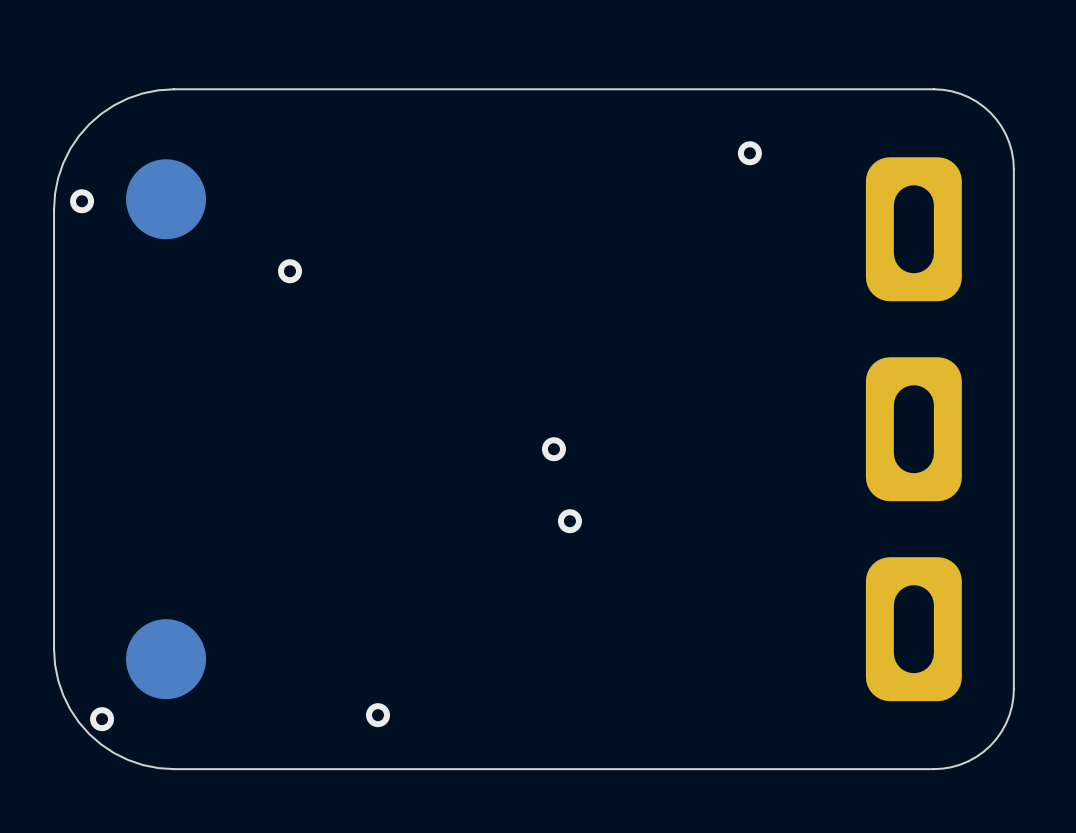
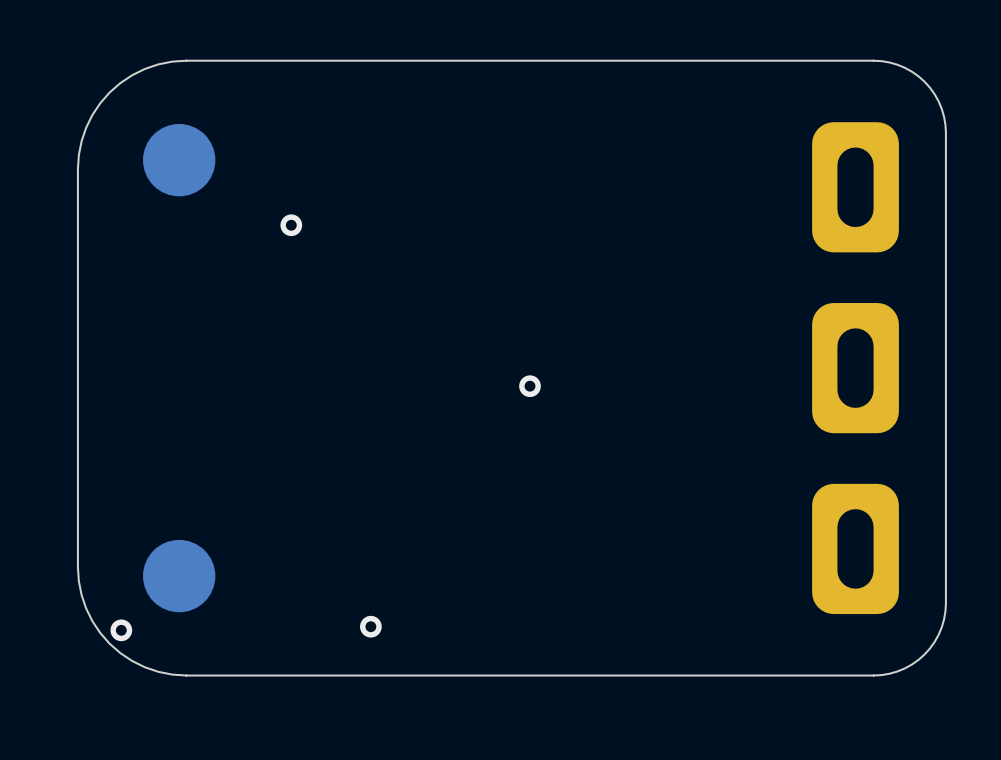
via: (749, 153) -> none
via: (82, 201) -> none
via: (569, 521) -> none

